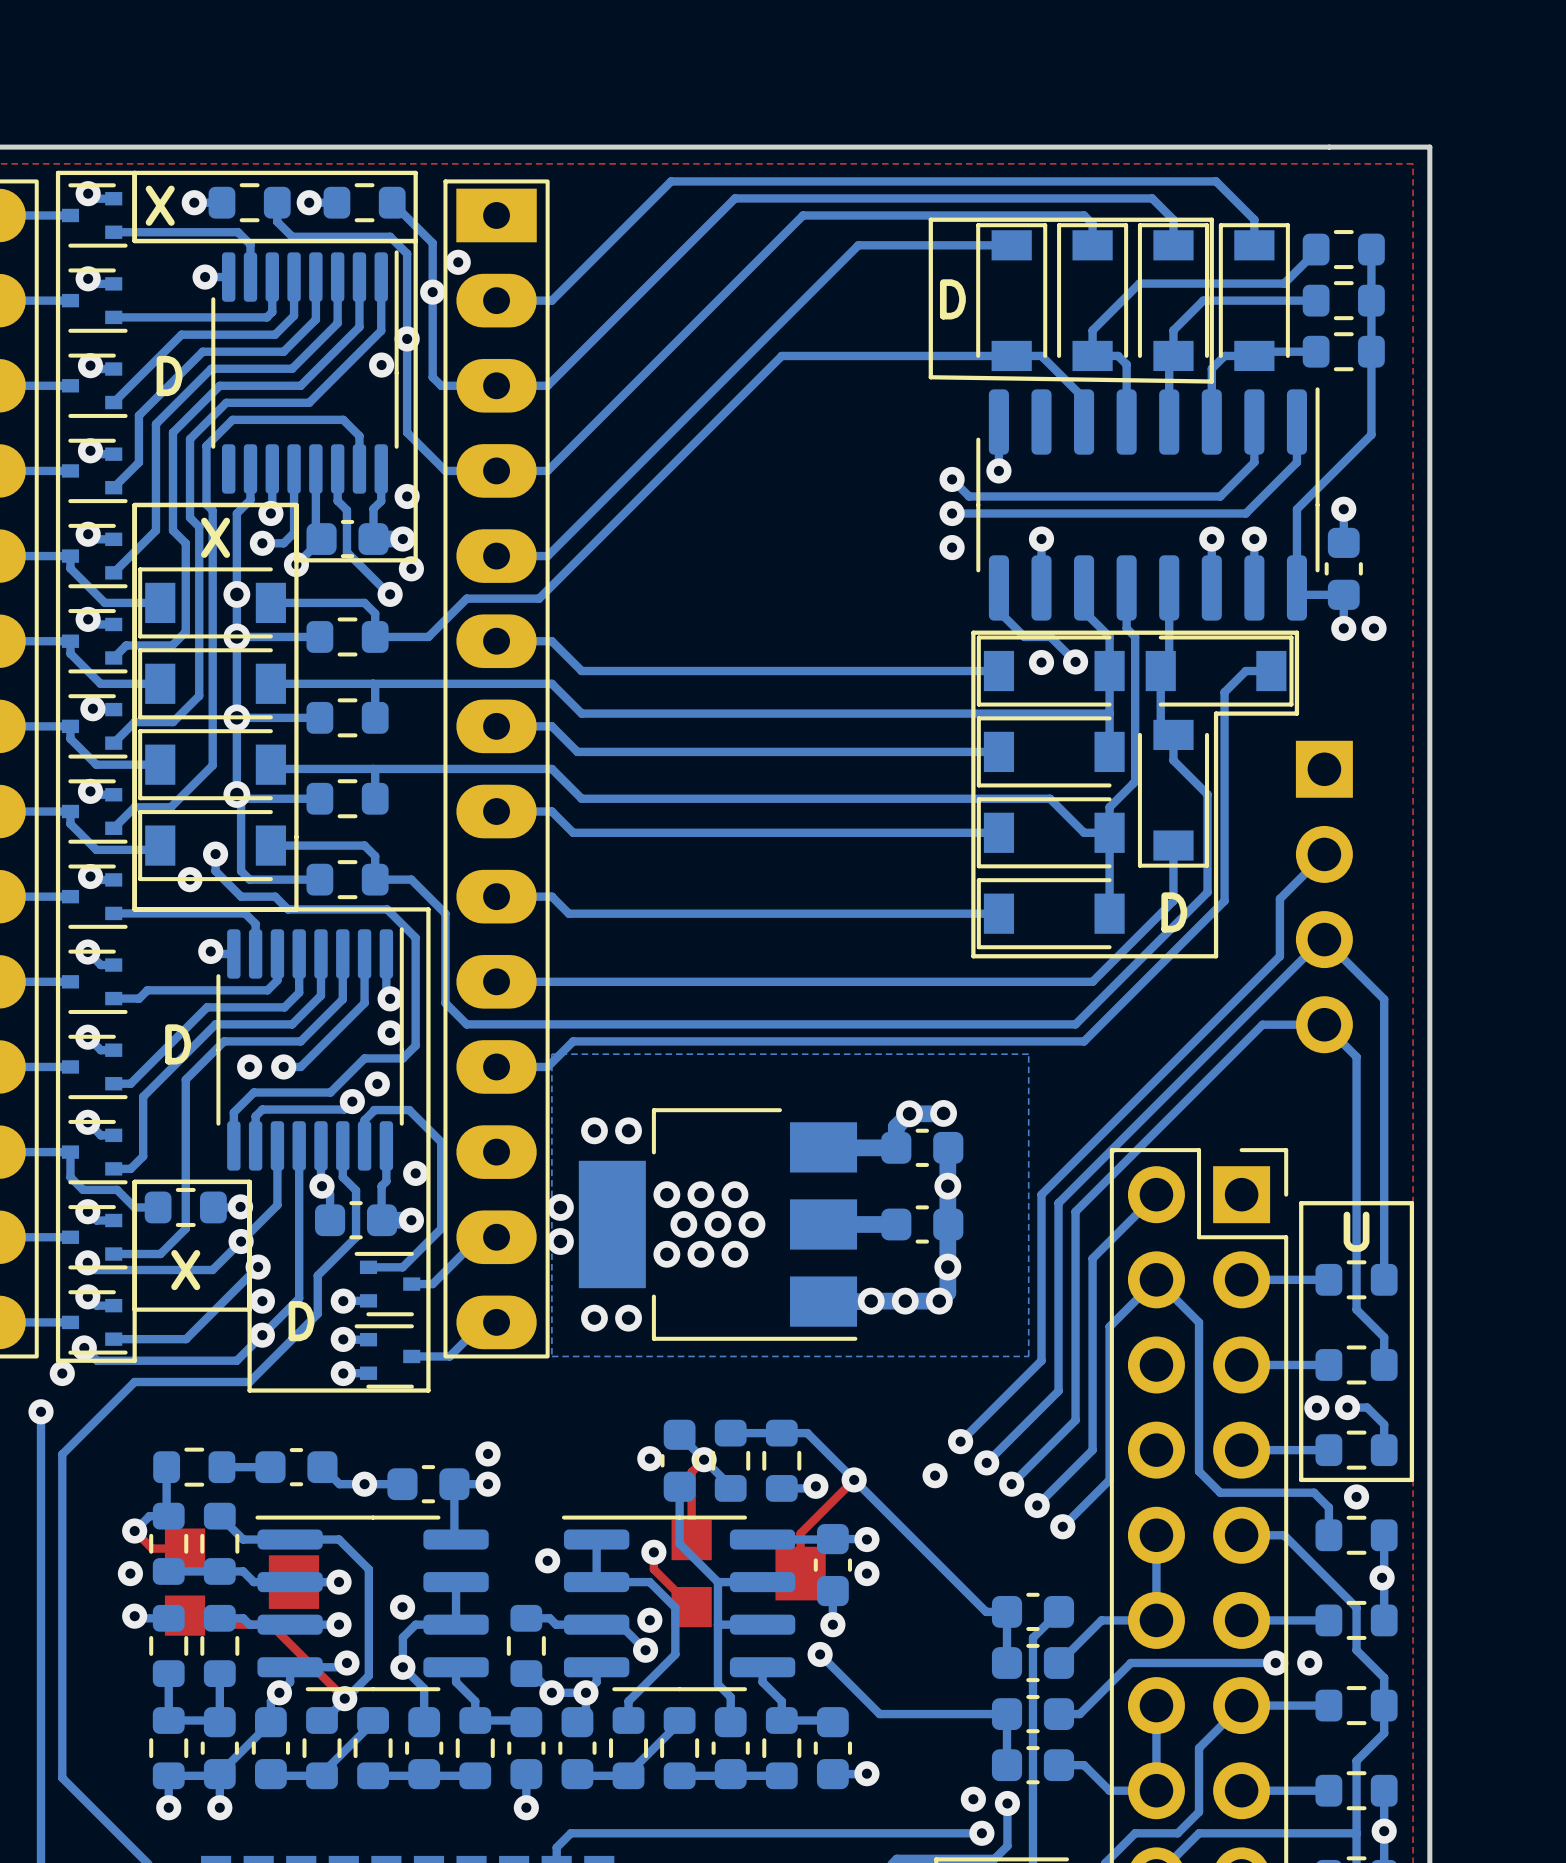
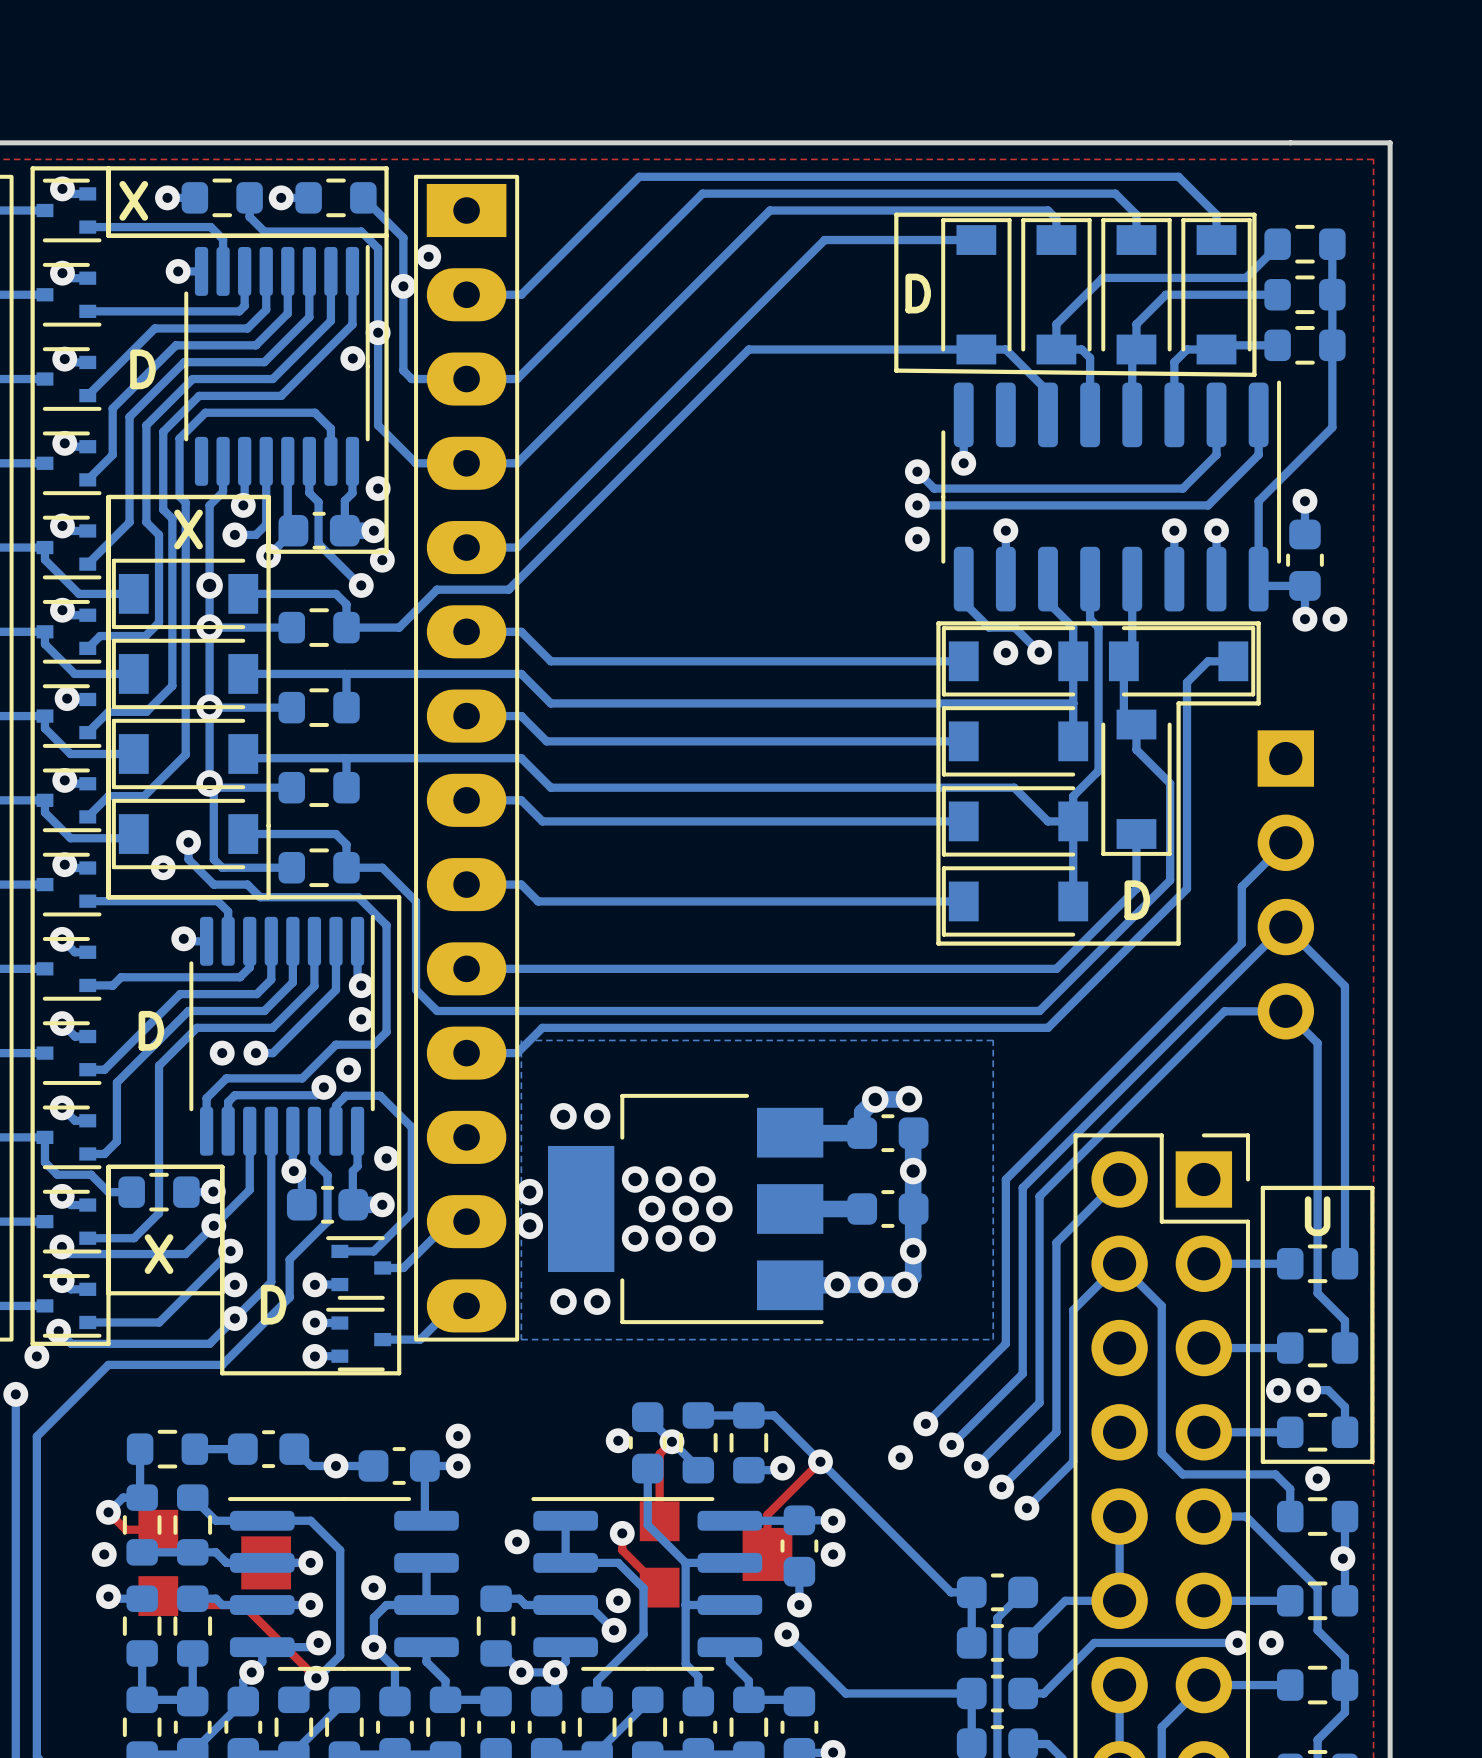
line: (1211, 219) (1211, 381) (930, 377) -> (1174, 214) (1254, 214) (1254, 374) (896, 370)

